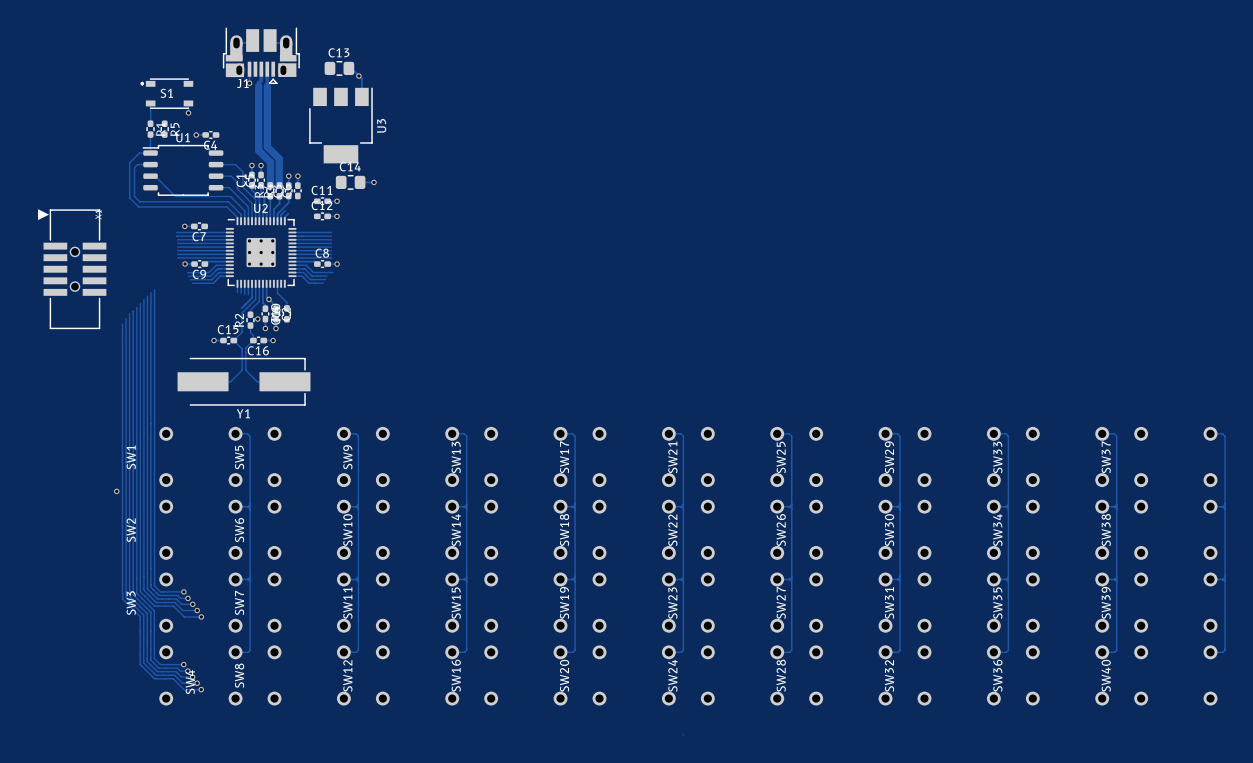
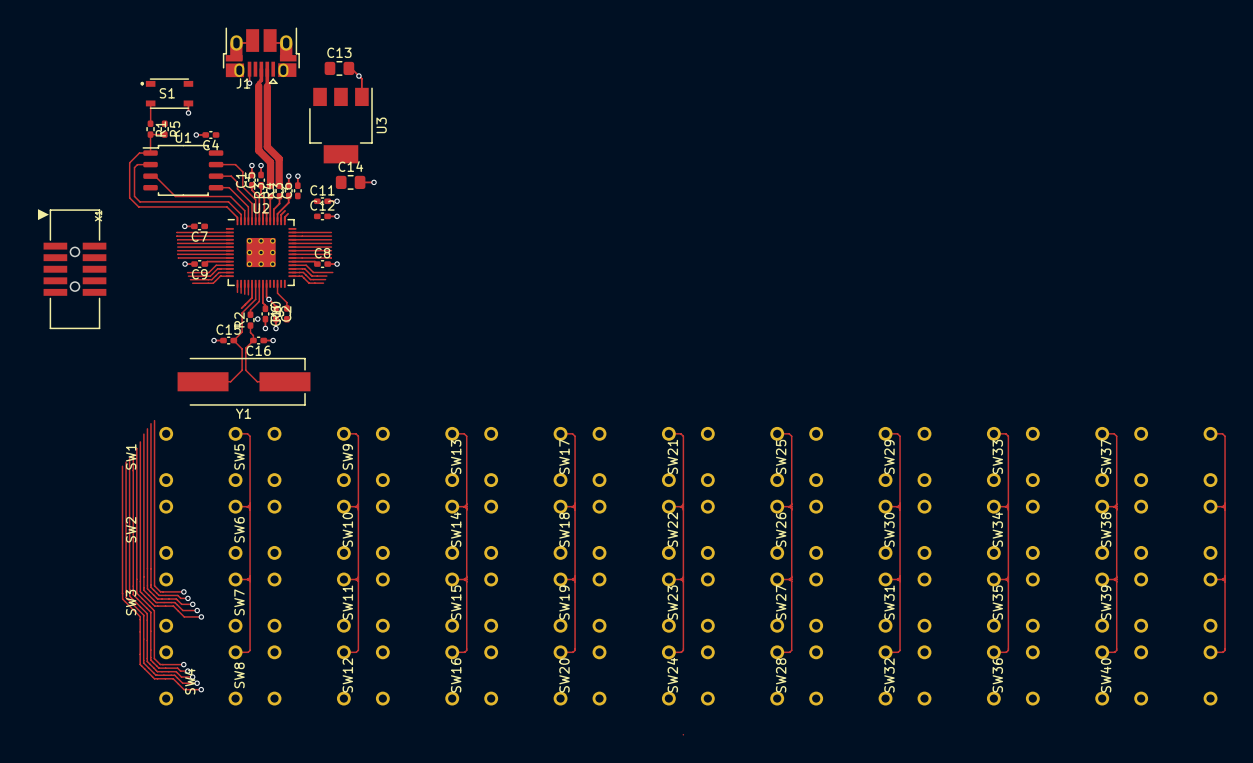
track: (154, 289) (154, 420) -> none
track: (150, 292) (150, 423) -> none
track: (147, 296) (147, 428) -> none
track: (143, 299) (143, 434) -> none
track: (140, 303) (140, 441) -> none
track: (136, 307) (136, 448) -> none
track: (129, 313) (129, 458) -> none
track: (126, 318) (126, 462) -> none
track: (122, 324) (122, 466) -> none
via: (116, 491) -> none

